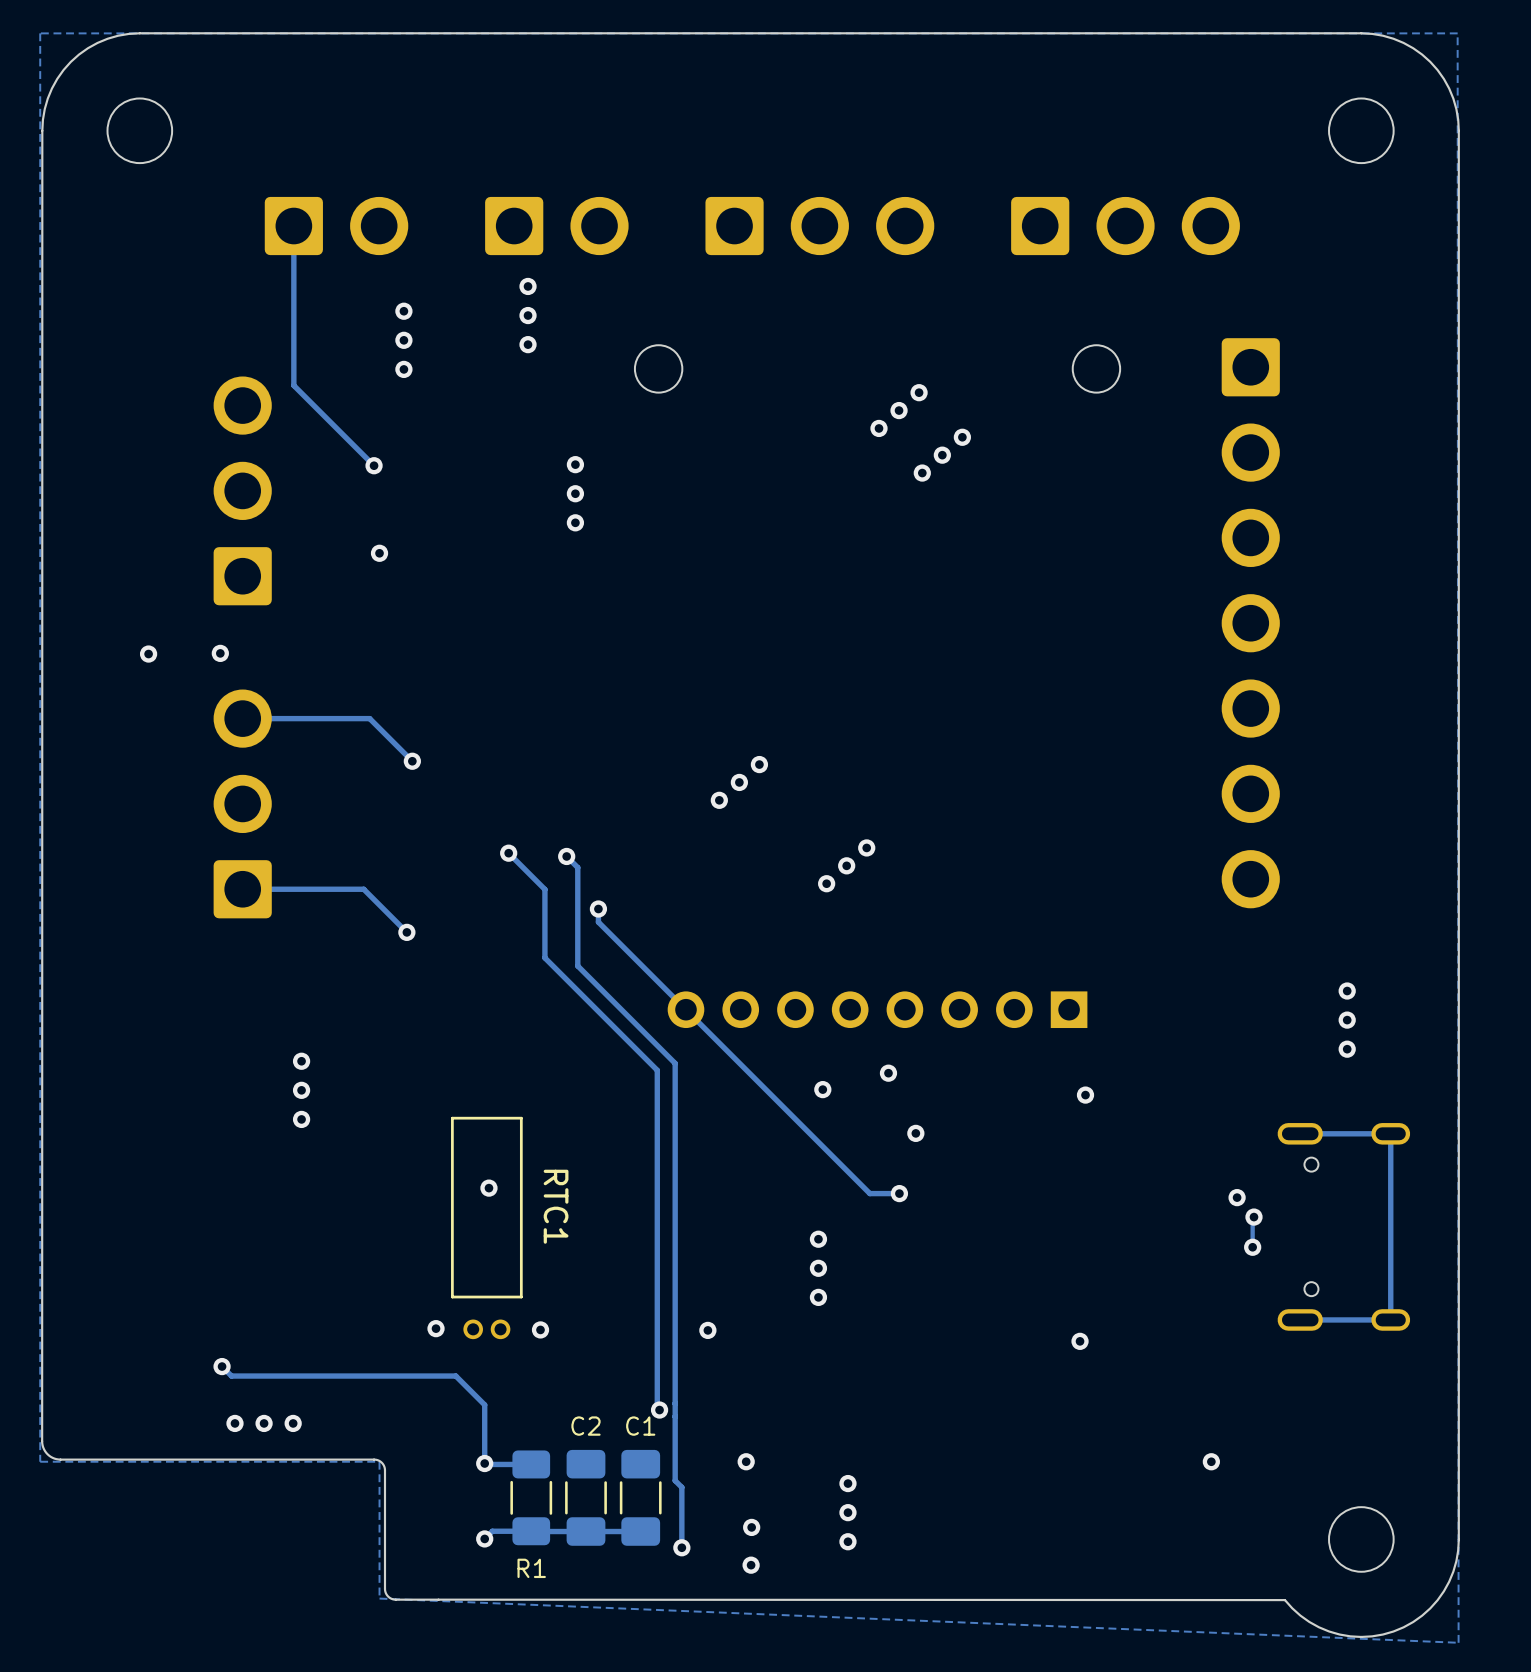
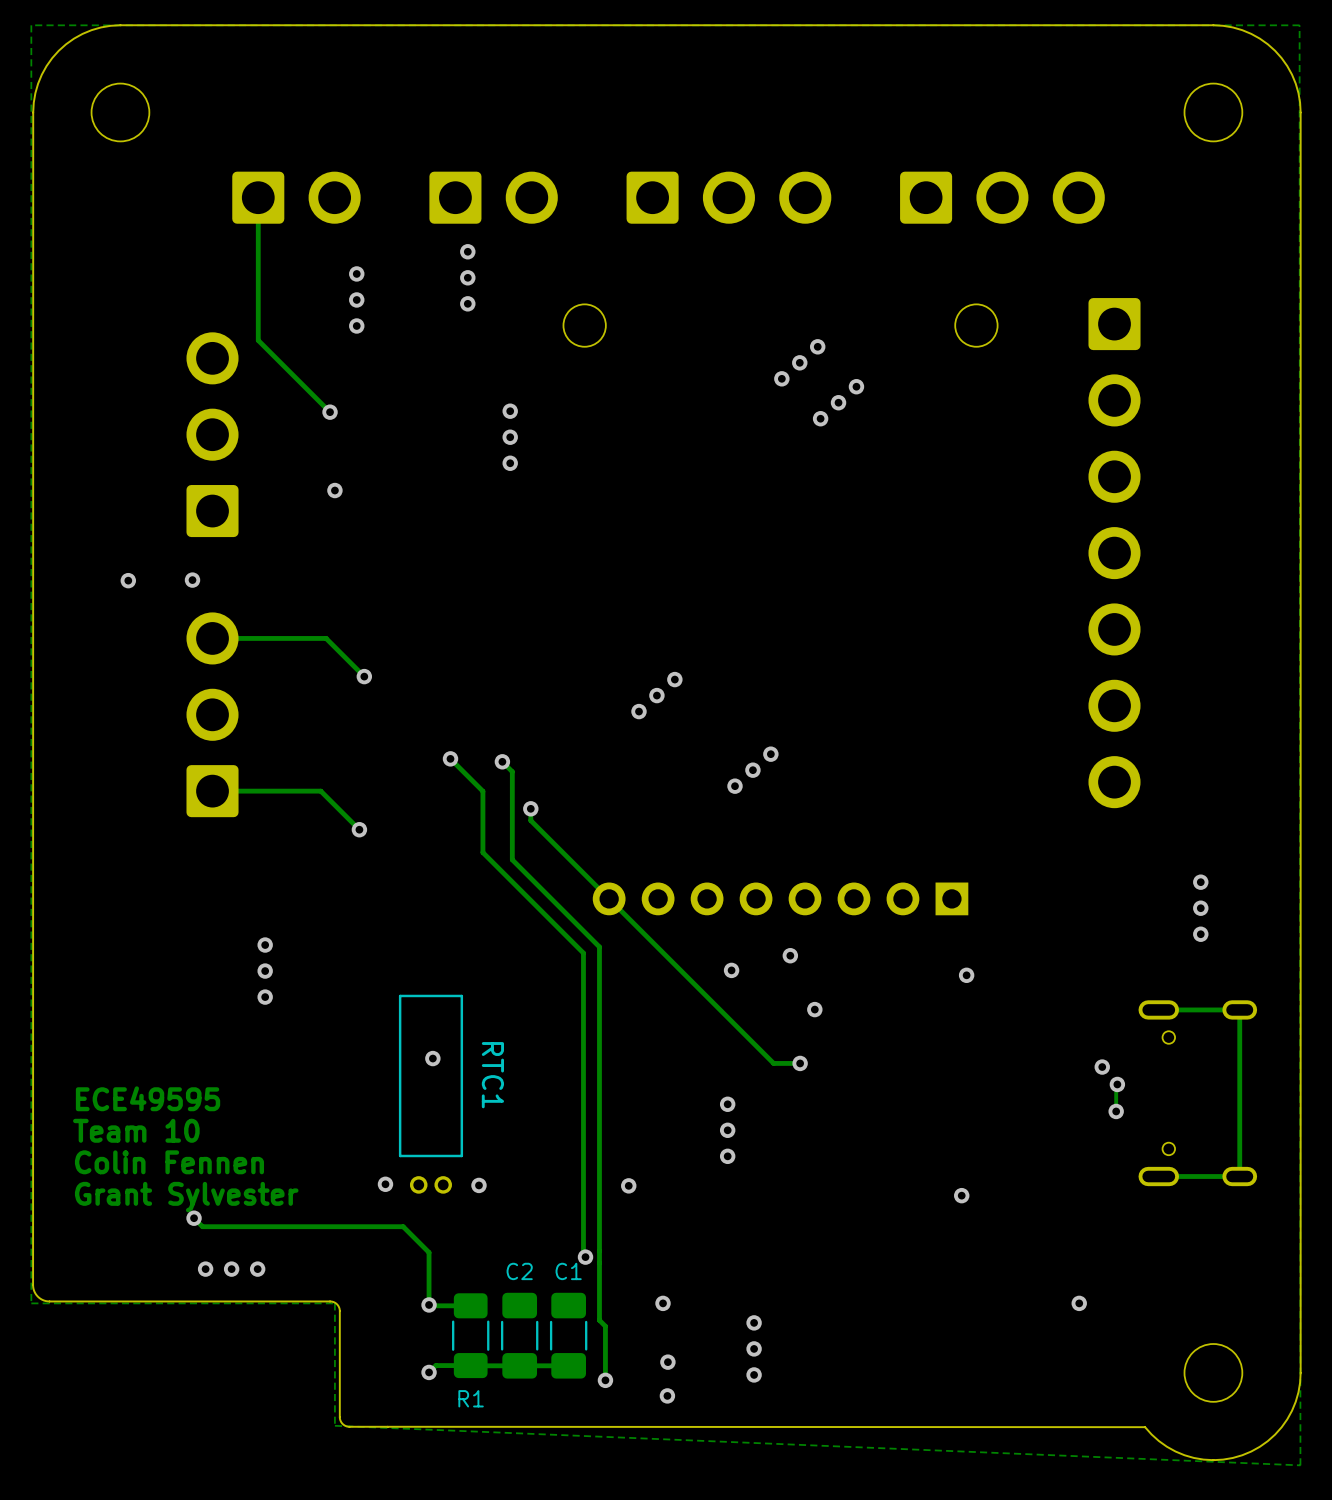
text: none -> ECE49595 (148, 1098)
text: none -> Team 10 (136, 1130)
text: none -> Colin Fennen (169, 1162)
text: none -> Grant Sylvester (186, 1197)

